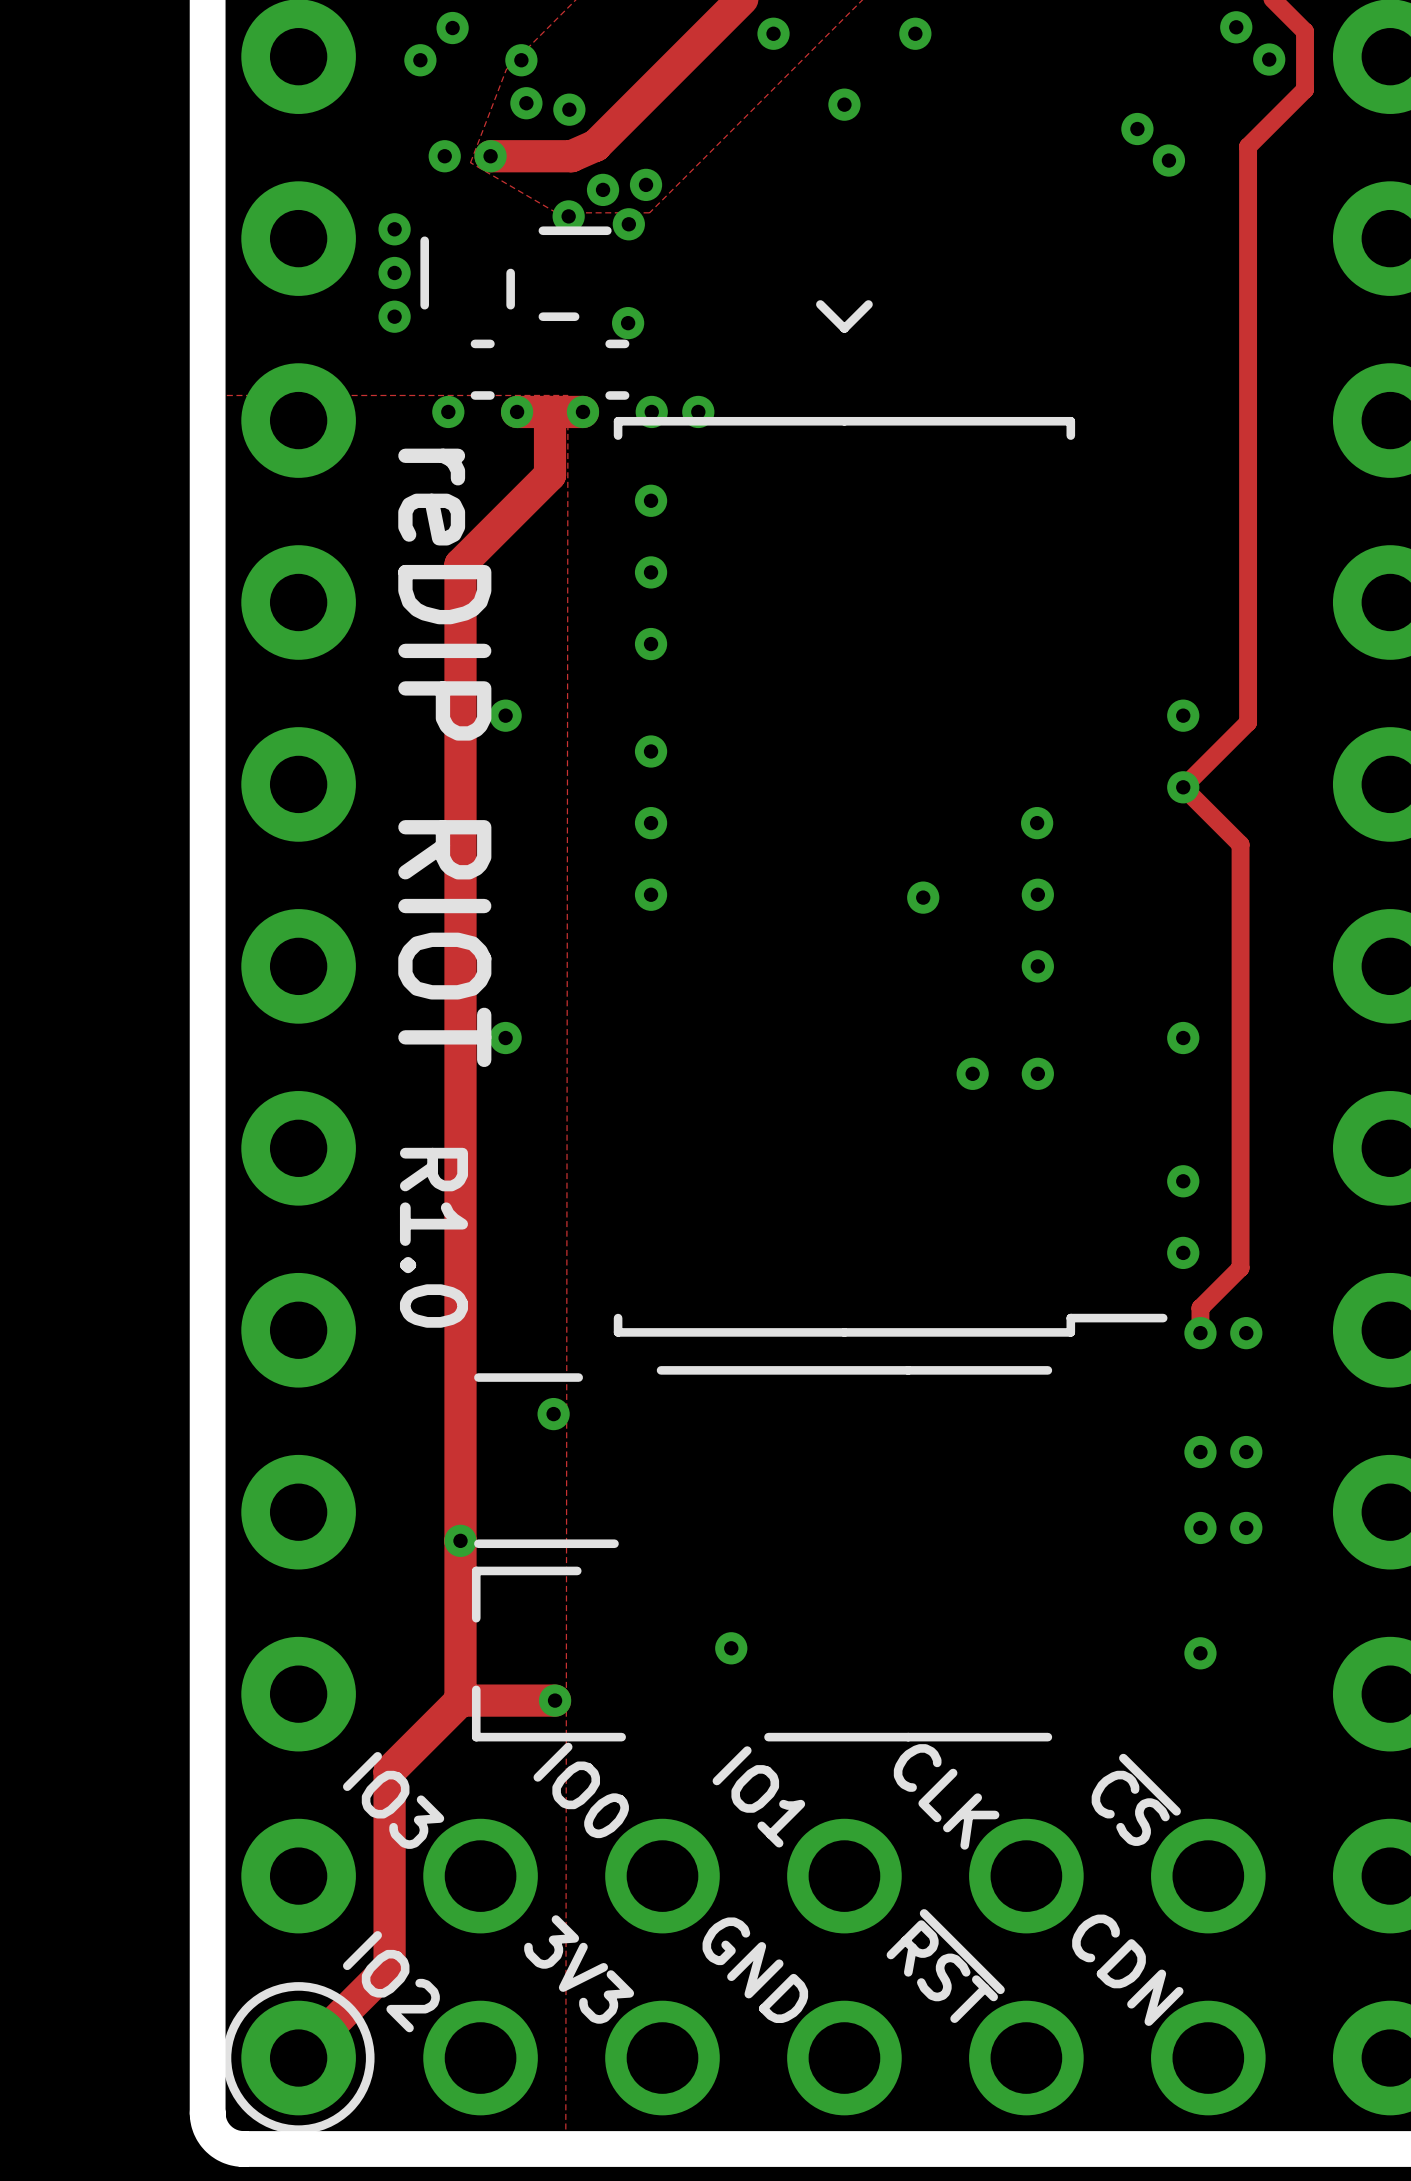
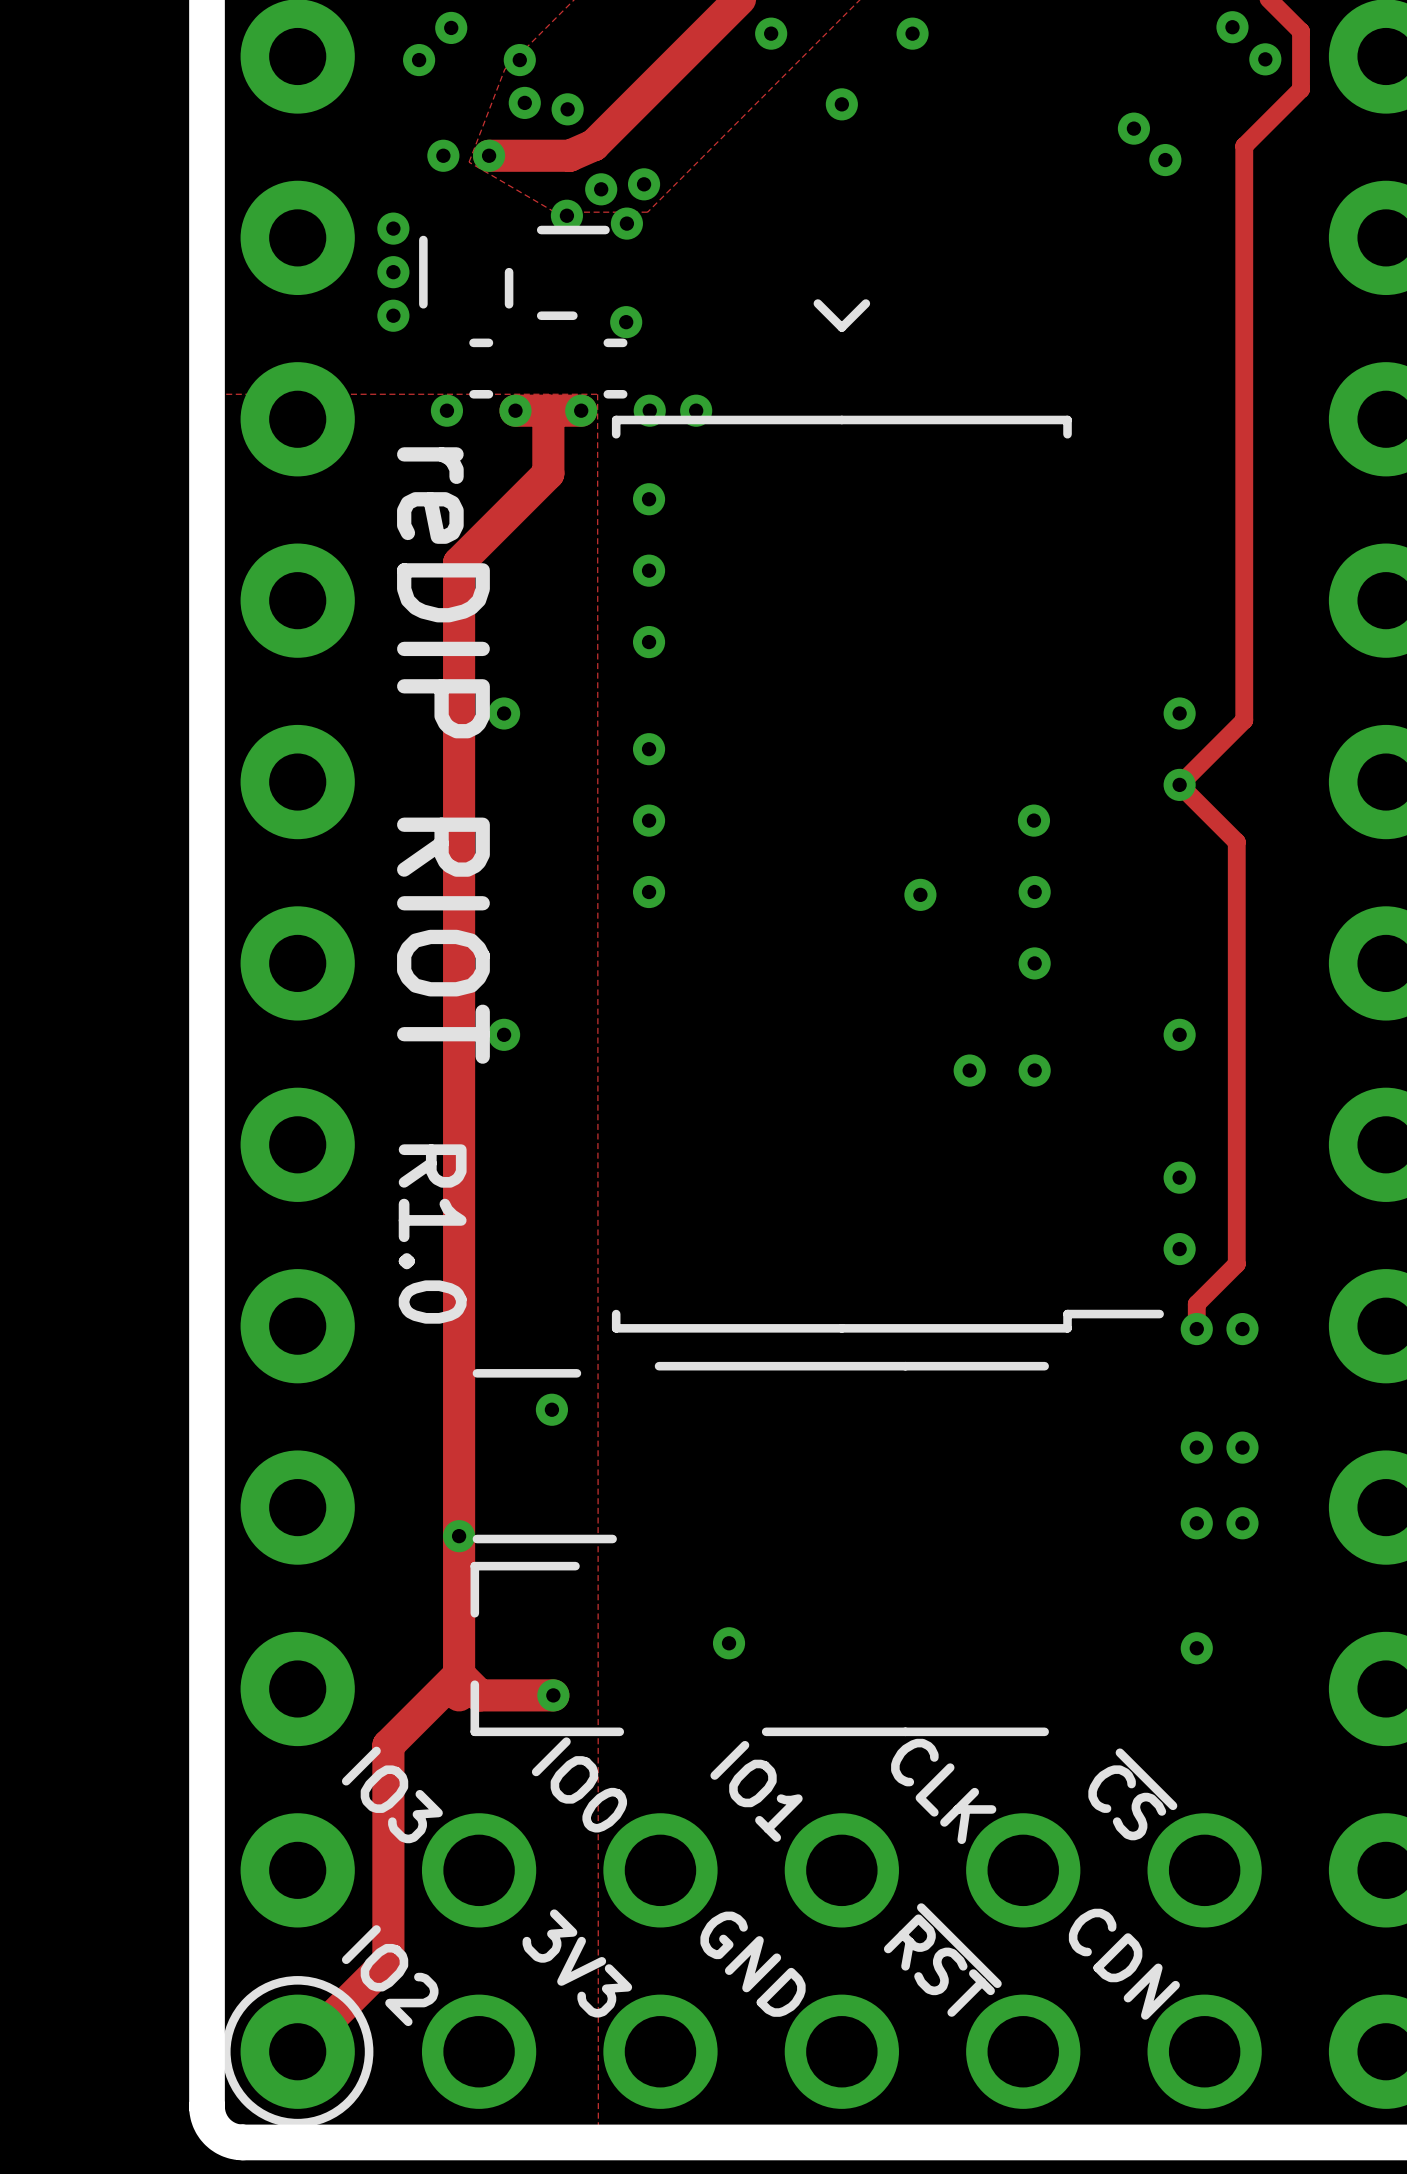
zone outline: (567, 395) (565, 2149) -> (566, 394) (597, 394) (598, 2142)
track: (481, 1700) (460, 1700) (389, 1771) -> (479, 1695) (459, 1674) (388, 1745) (388, 1766)

